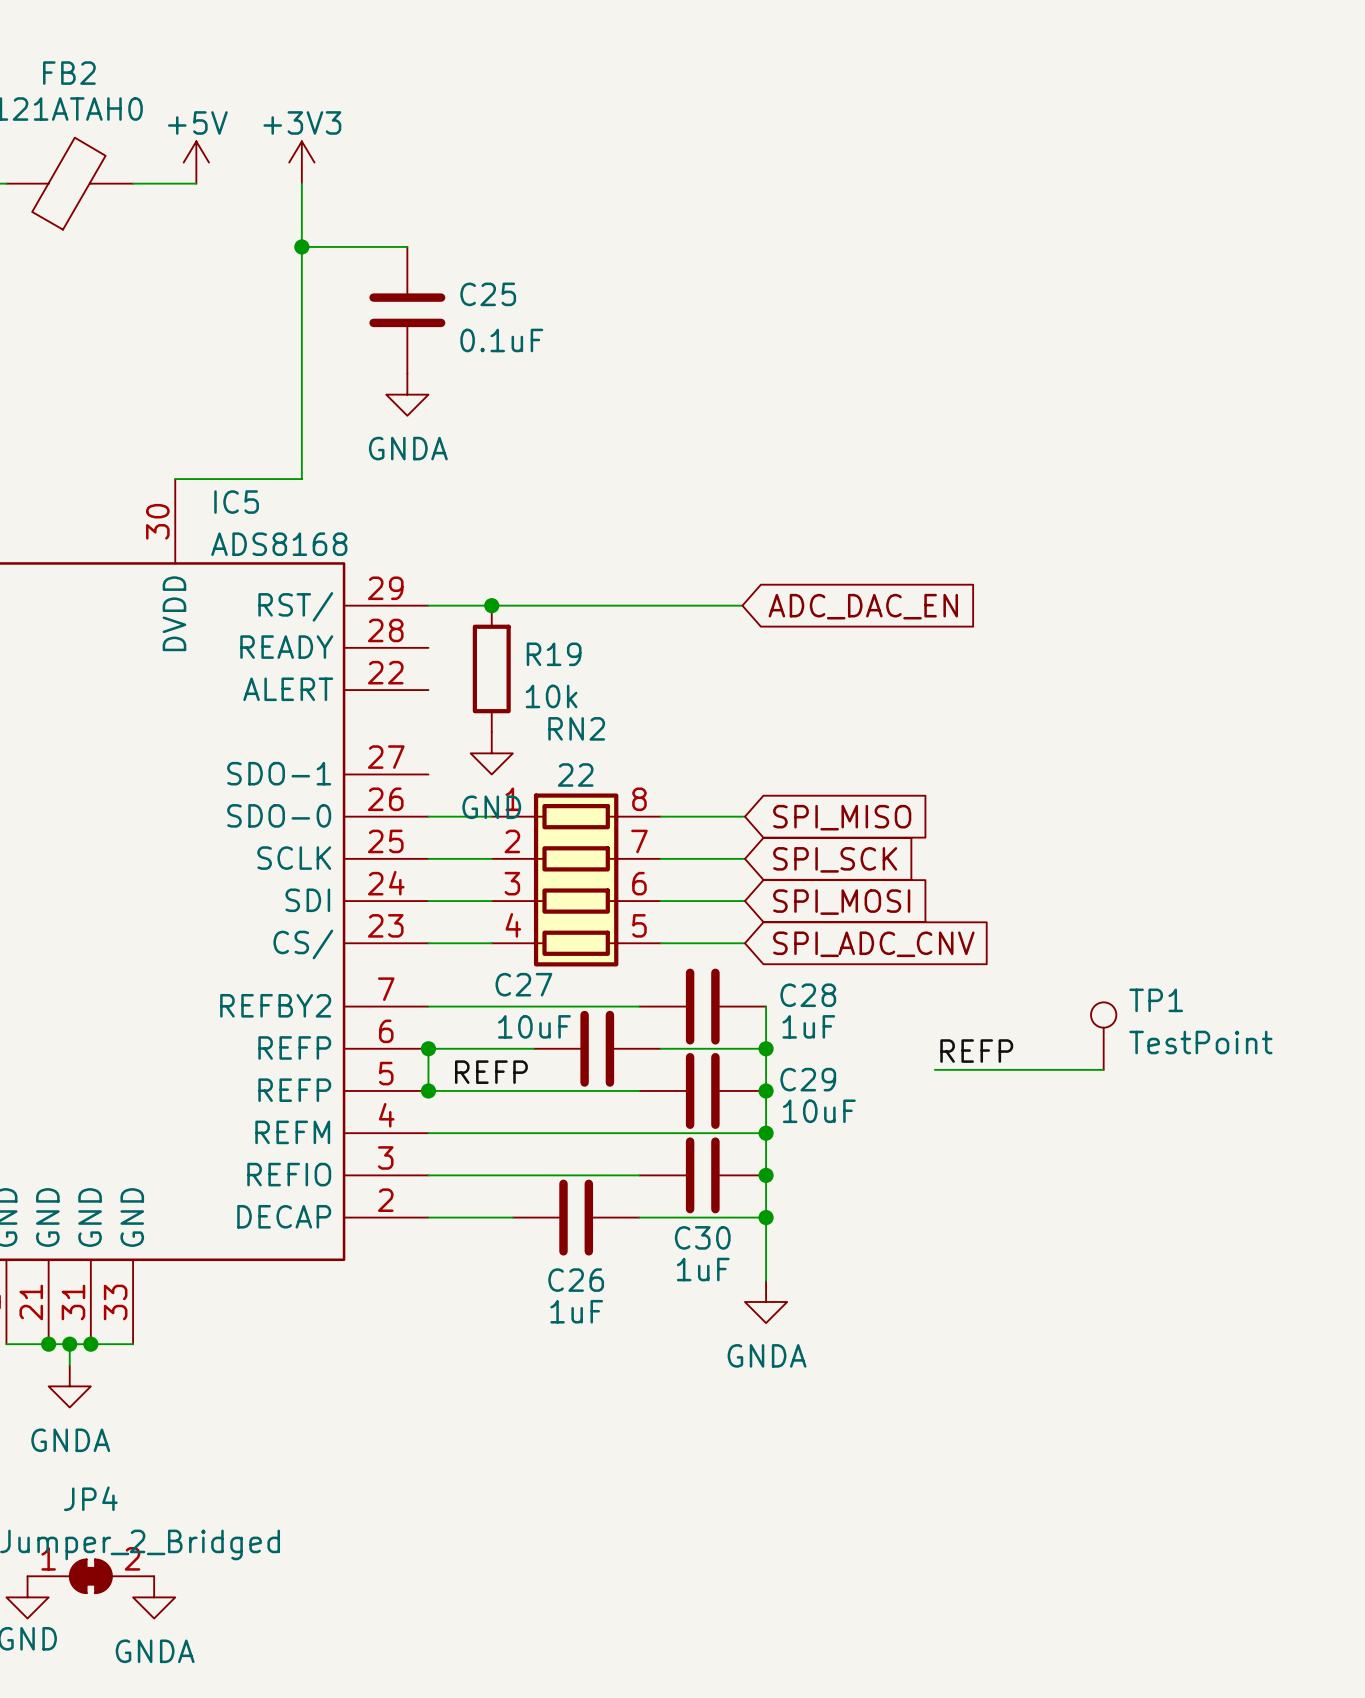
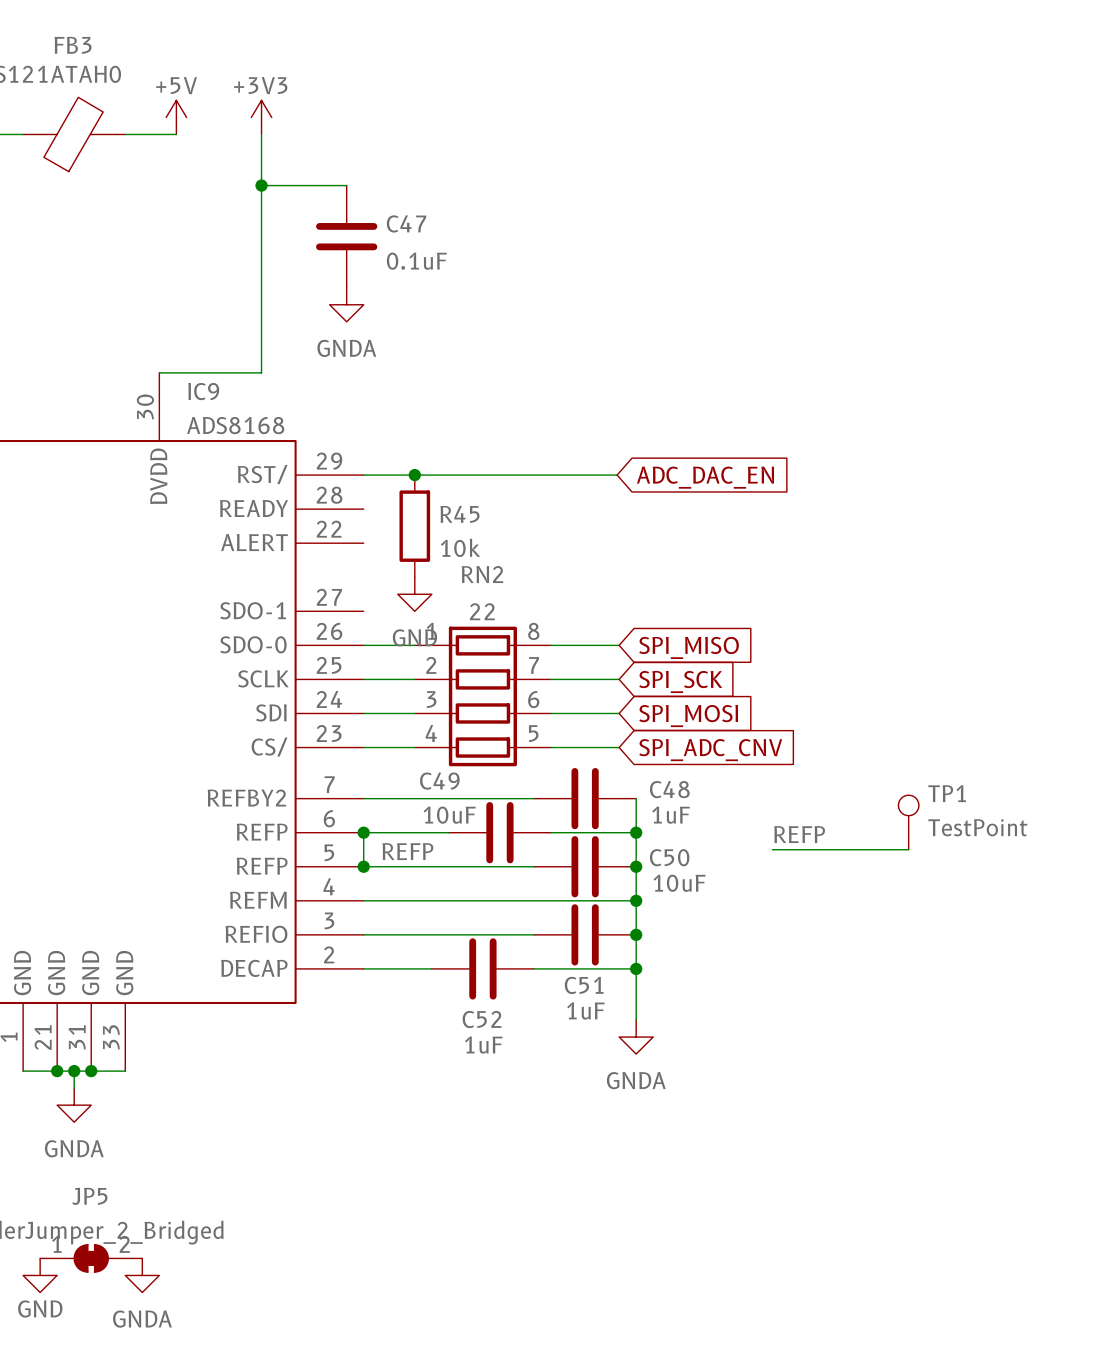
FB2 name: FB2 (69, 73) -> FB3 (73, 45)
C25 name: C25 (488, 294) -> C47 (406, 223)
IC5 name: IC5 (236, 502) -> IC9 (203, 391)
R19 name: R19 (554, 654) -> R45 (459, 514)
C27 name: C27 (523, 984) -> C49 (439, 781)
C28 name: C28 (808, 995) -> C48 (669, 789)
C29 name: C29 (808, 1079) -> C50 (669, 857)
C30 name: C30 (702, 1237) -> C51 (584, 985)
C26 name: C26 (576, 1280) -> C52 (482, 1019)
JP4 name: JP4 (90, 1498) -> JP5 (89, 1196)

